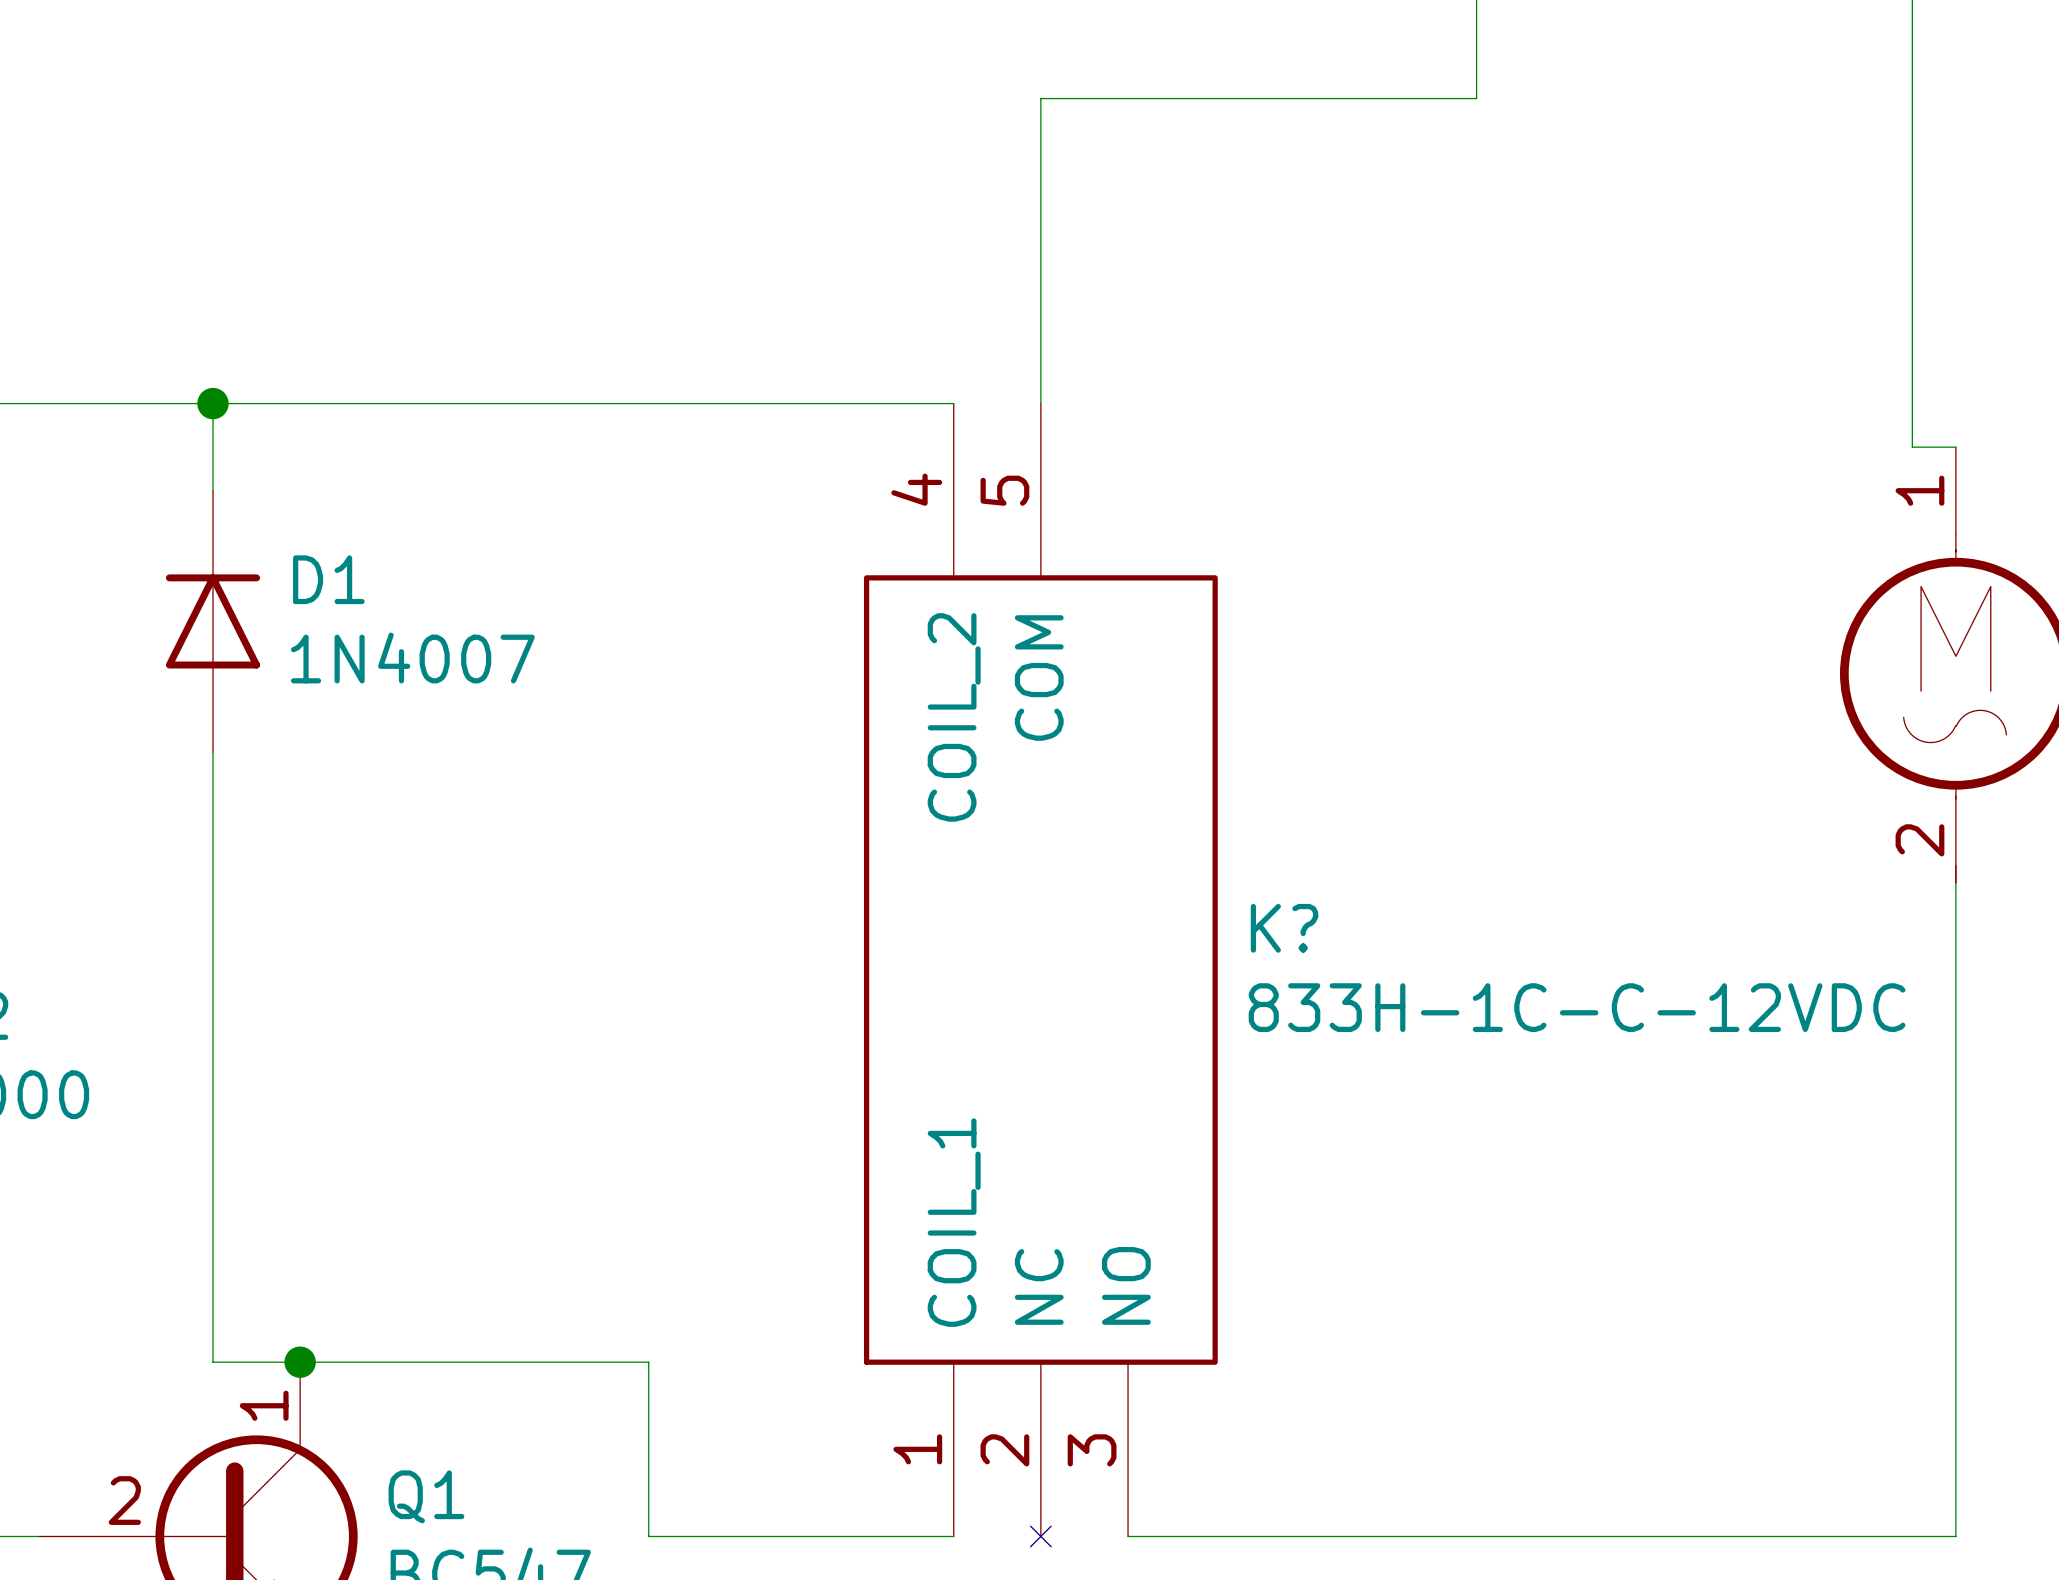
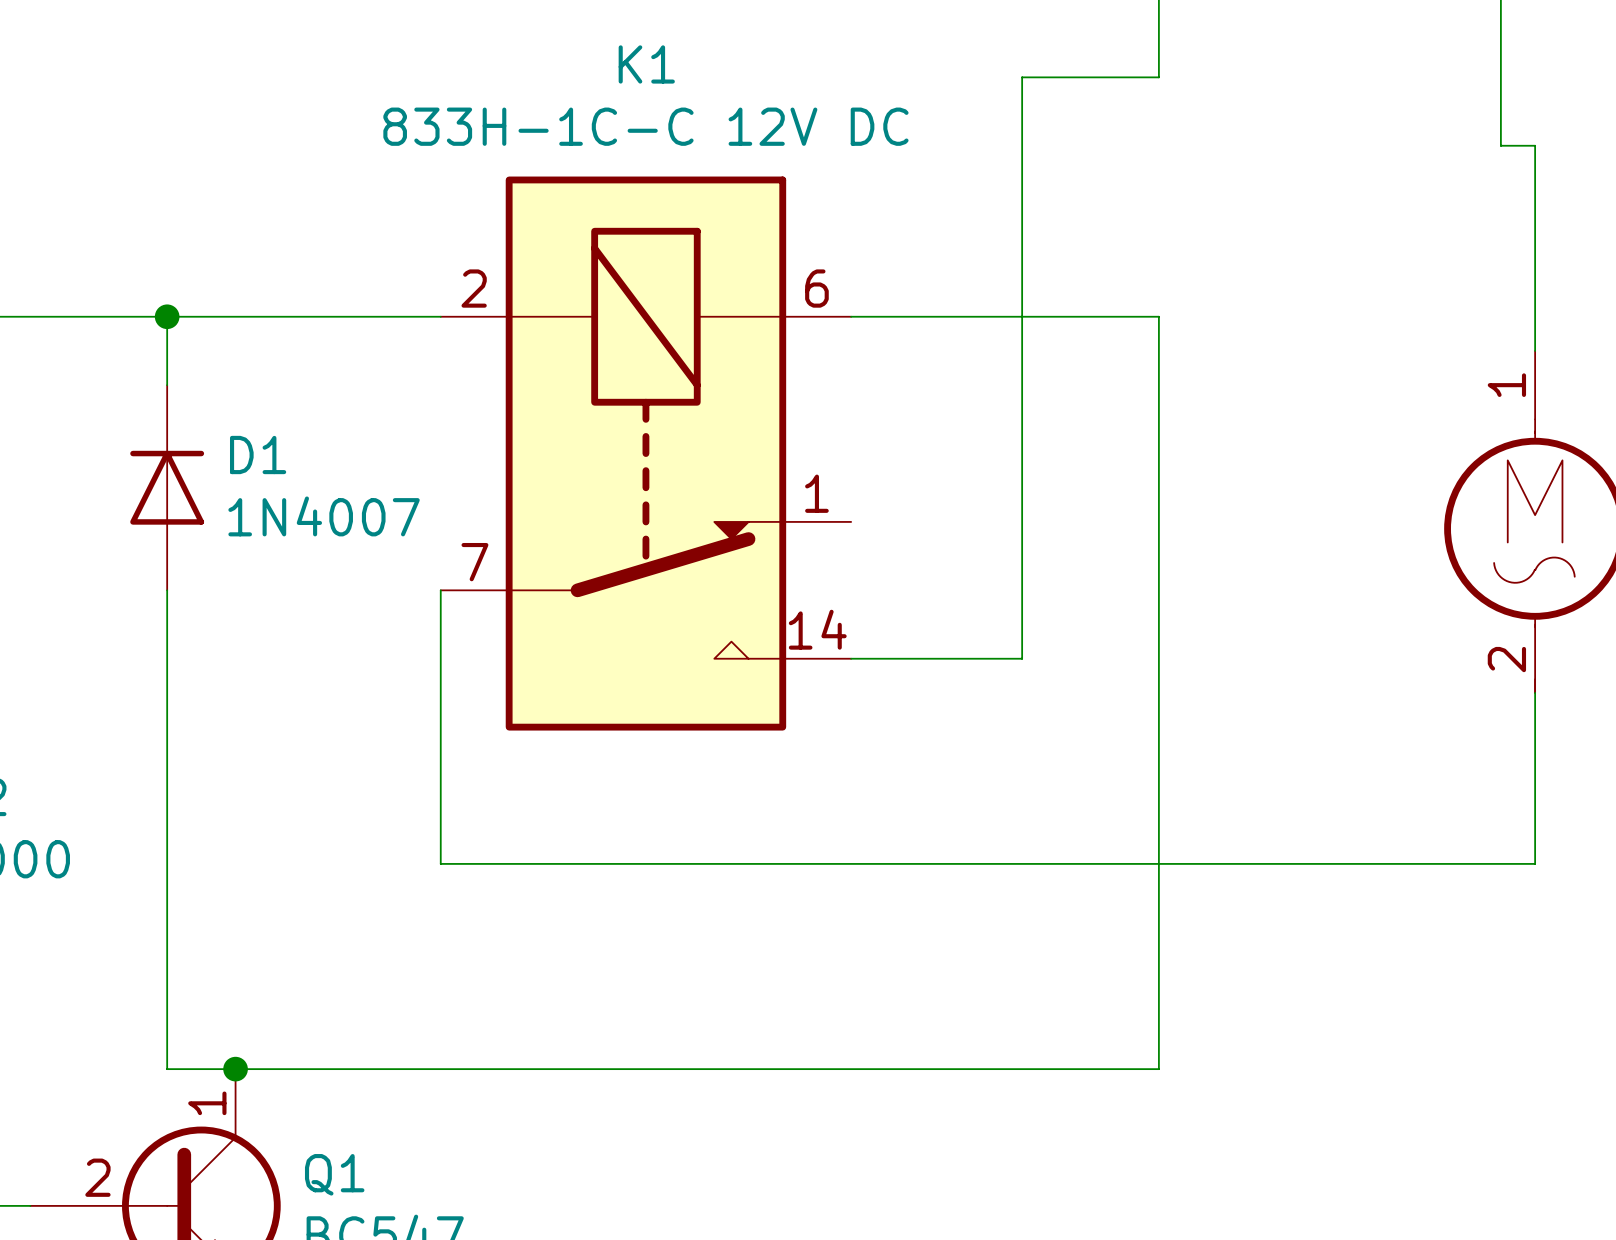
wire: (1302, 98) (1040, 98) (1040, 403) -> (1022, 77) (1022, 658) (851, 658)
wire: (1912, 185) (1912, 447) (1955, 447) -> (1500, 145) (1535, 145) (1535, 350)
K1: none -> 833H-1C-C 12V DC (645, 453)
K?: 833H-1C-C-12VDC (1040, 975) -> none
wire: (1955, 1100) (1955, 1536) (1128, 1536) -> (1535, 863) (440, 863) (440, 590)
wire: (648, 1362) (648, 1536) (953, 1536) -> (509, 1069) (1158, 1069) (1158, 316) (851, 316)

